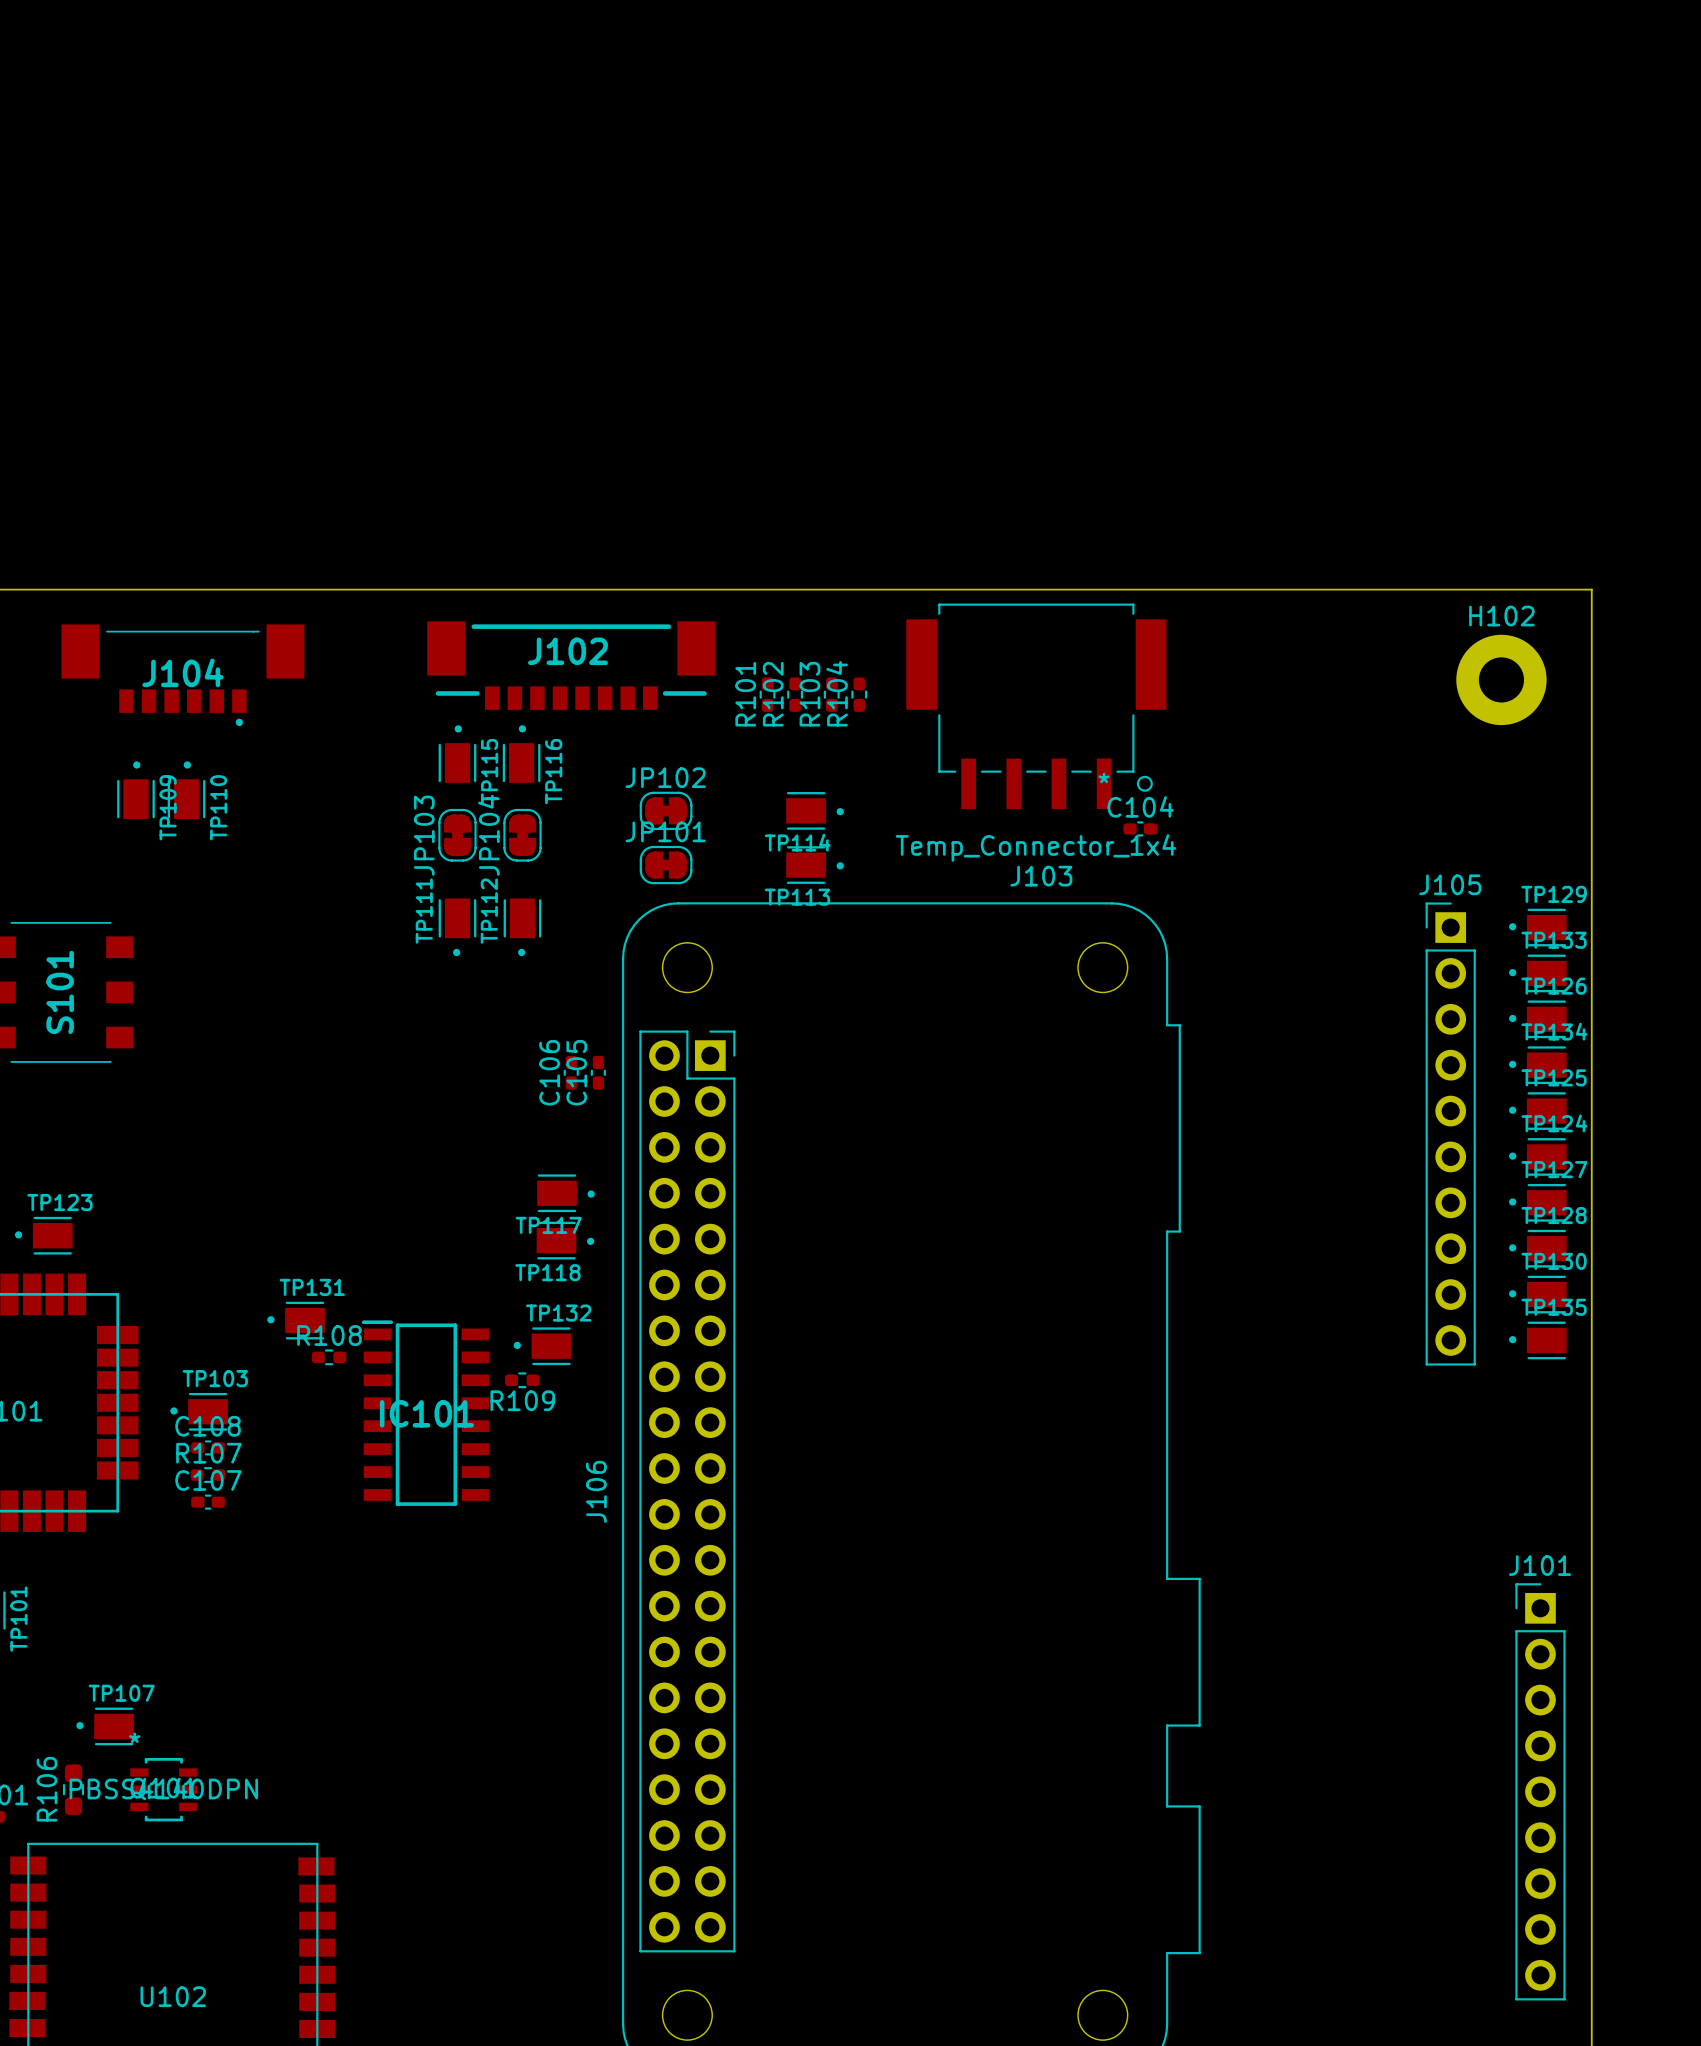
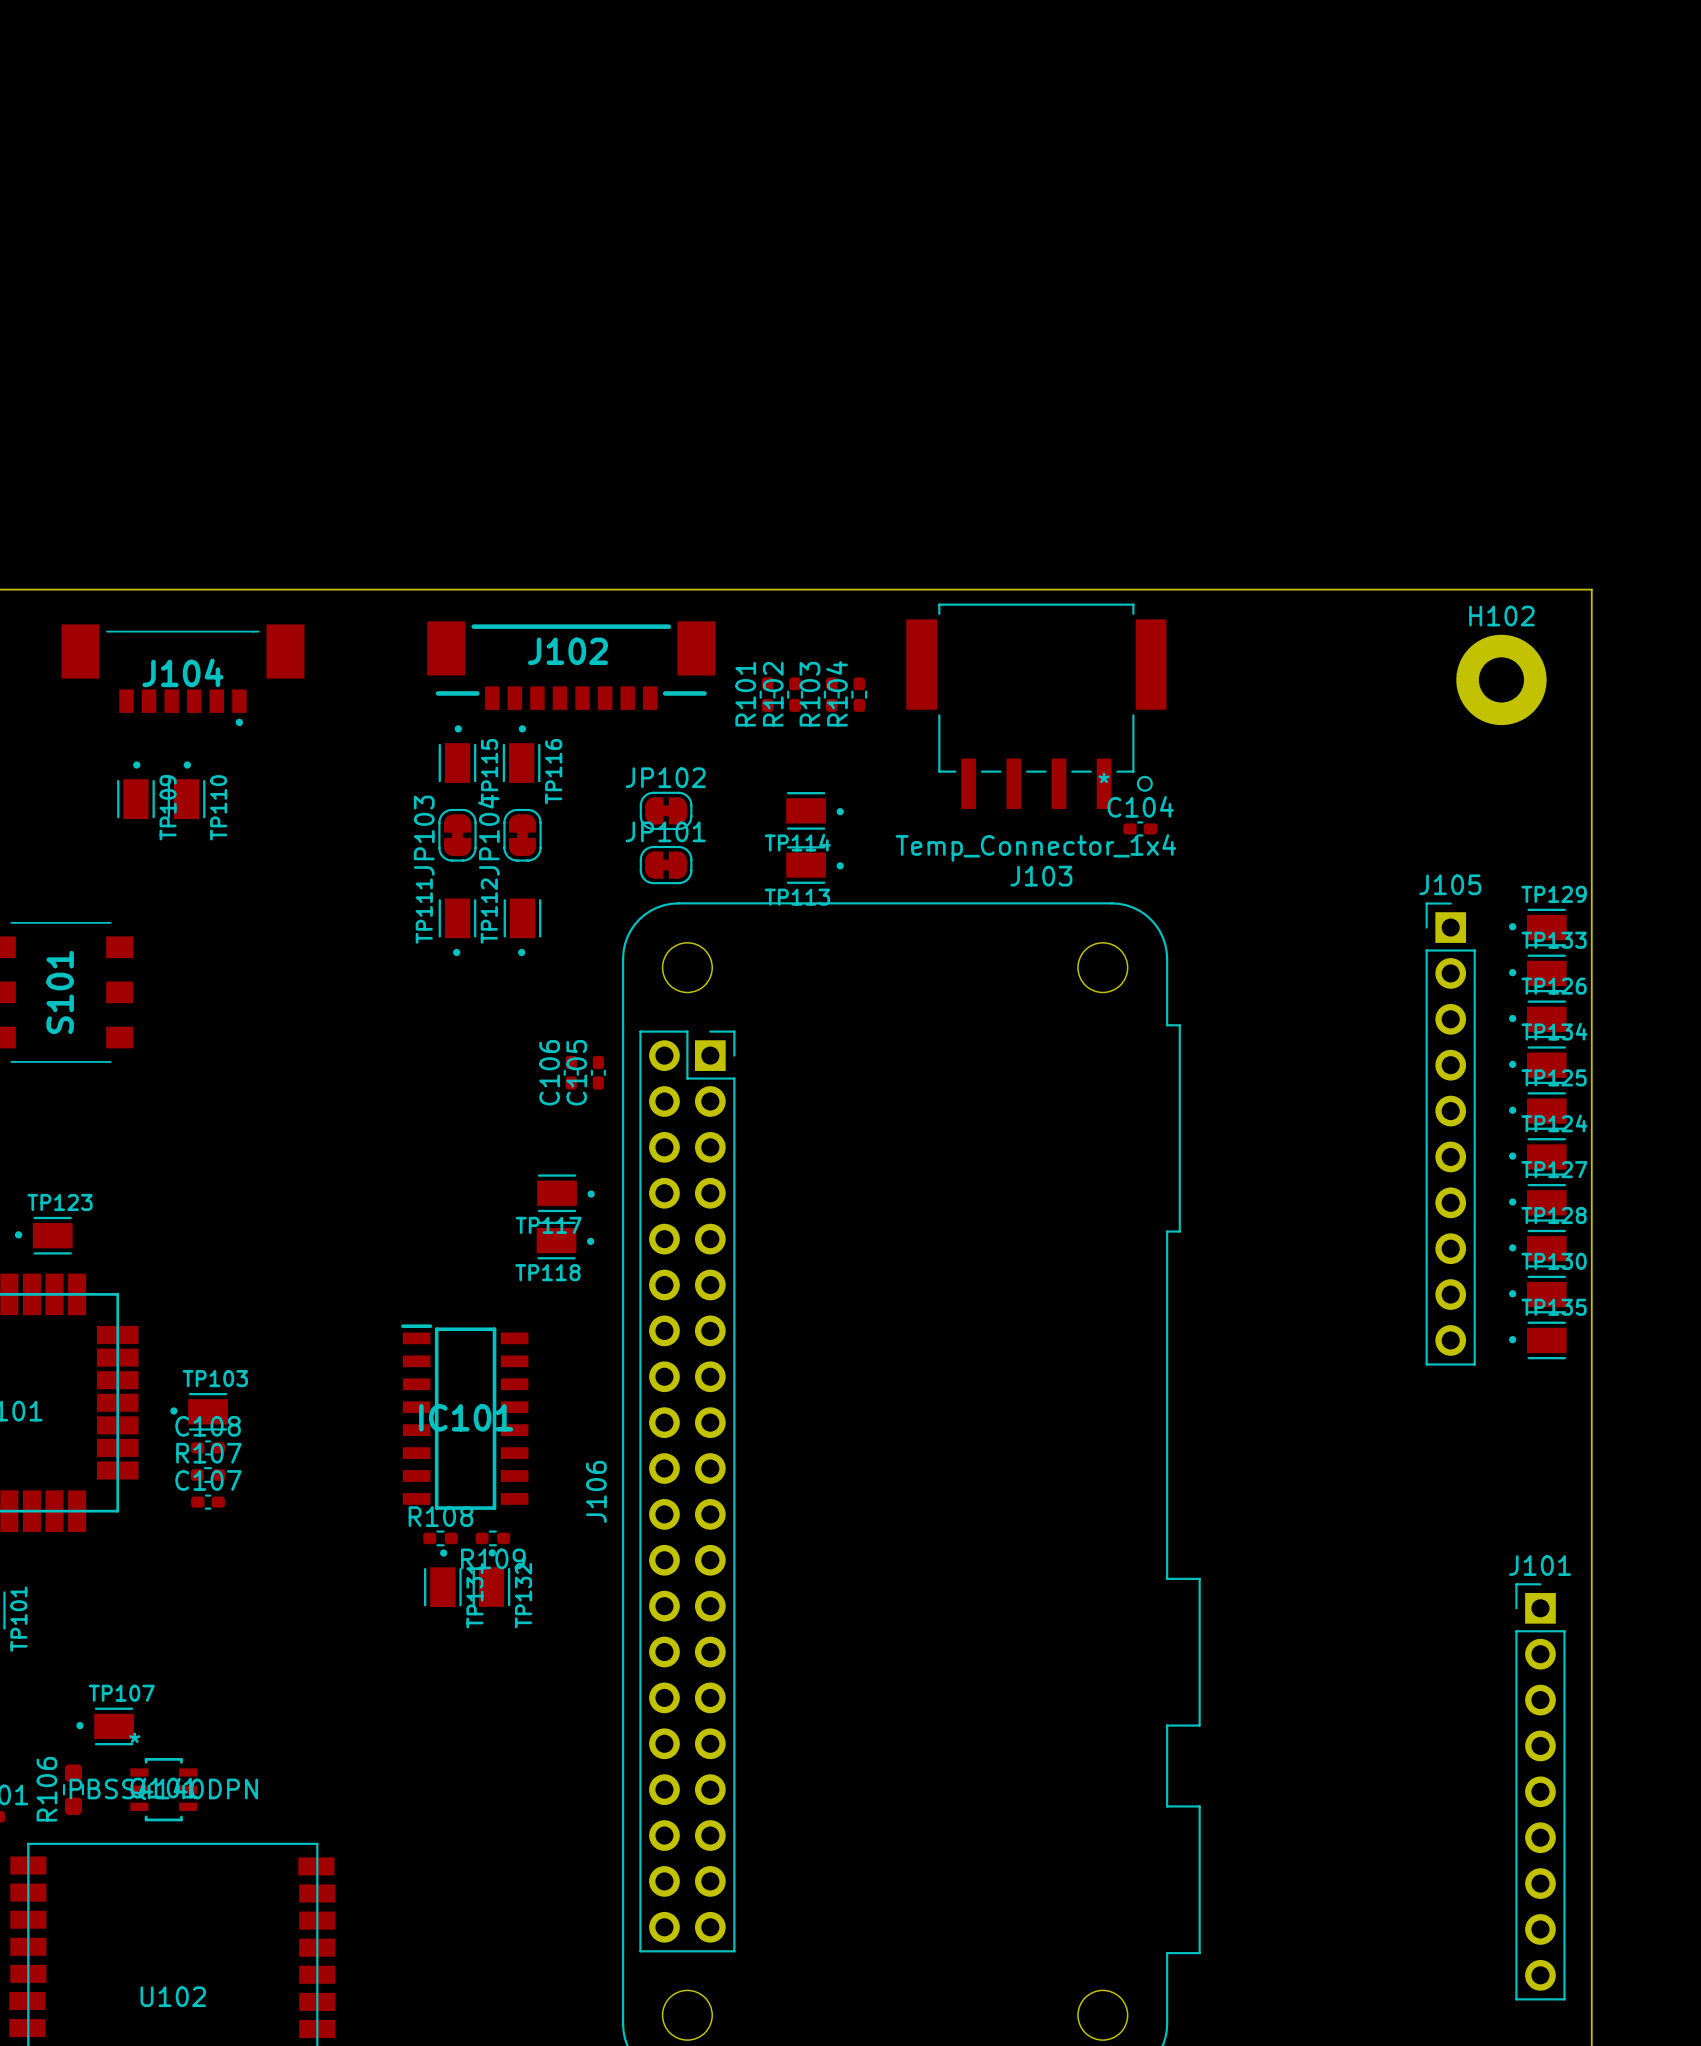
TP131 rotation: 0° (296, 1320) -> 90° clockwise (442, 1578)
TP131 position: (296, 1320) -> (442, 1578)
TP132 rotation: 0° (542, 1346) -> 90° clockwise (491, 1578)
TP132 position: (542, 1346) -> (491, 1578)
R108 position: (329, 1357) -> (440, 1538)
R109 position: (522, 1380) -> (492, 1538)
IC101 position: (425, 1413) -> (464, 1417)

